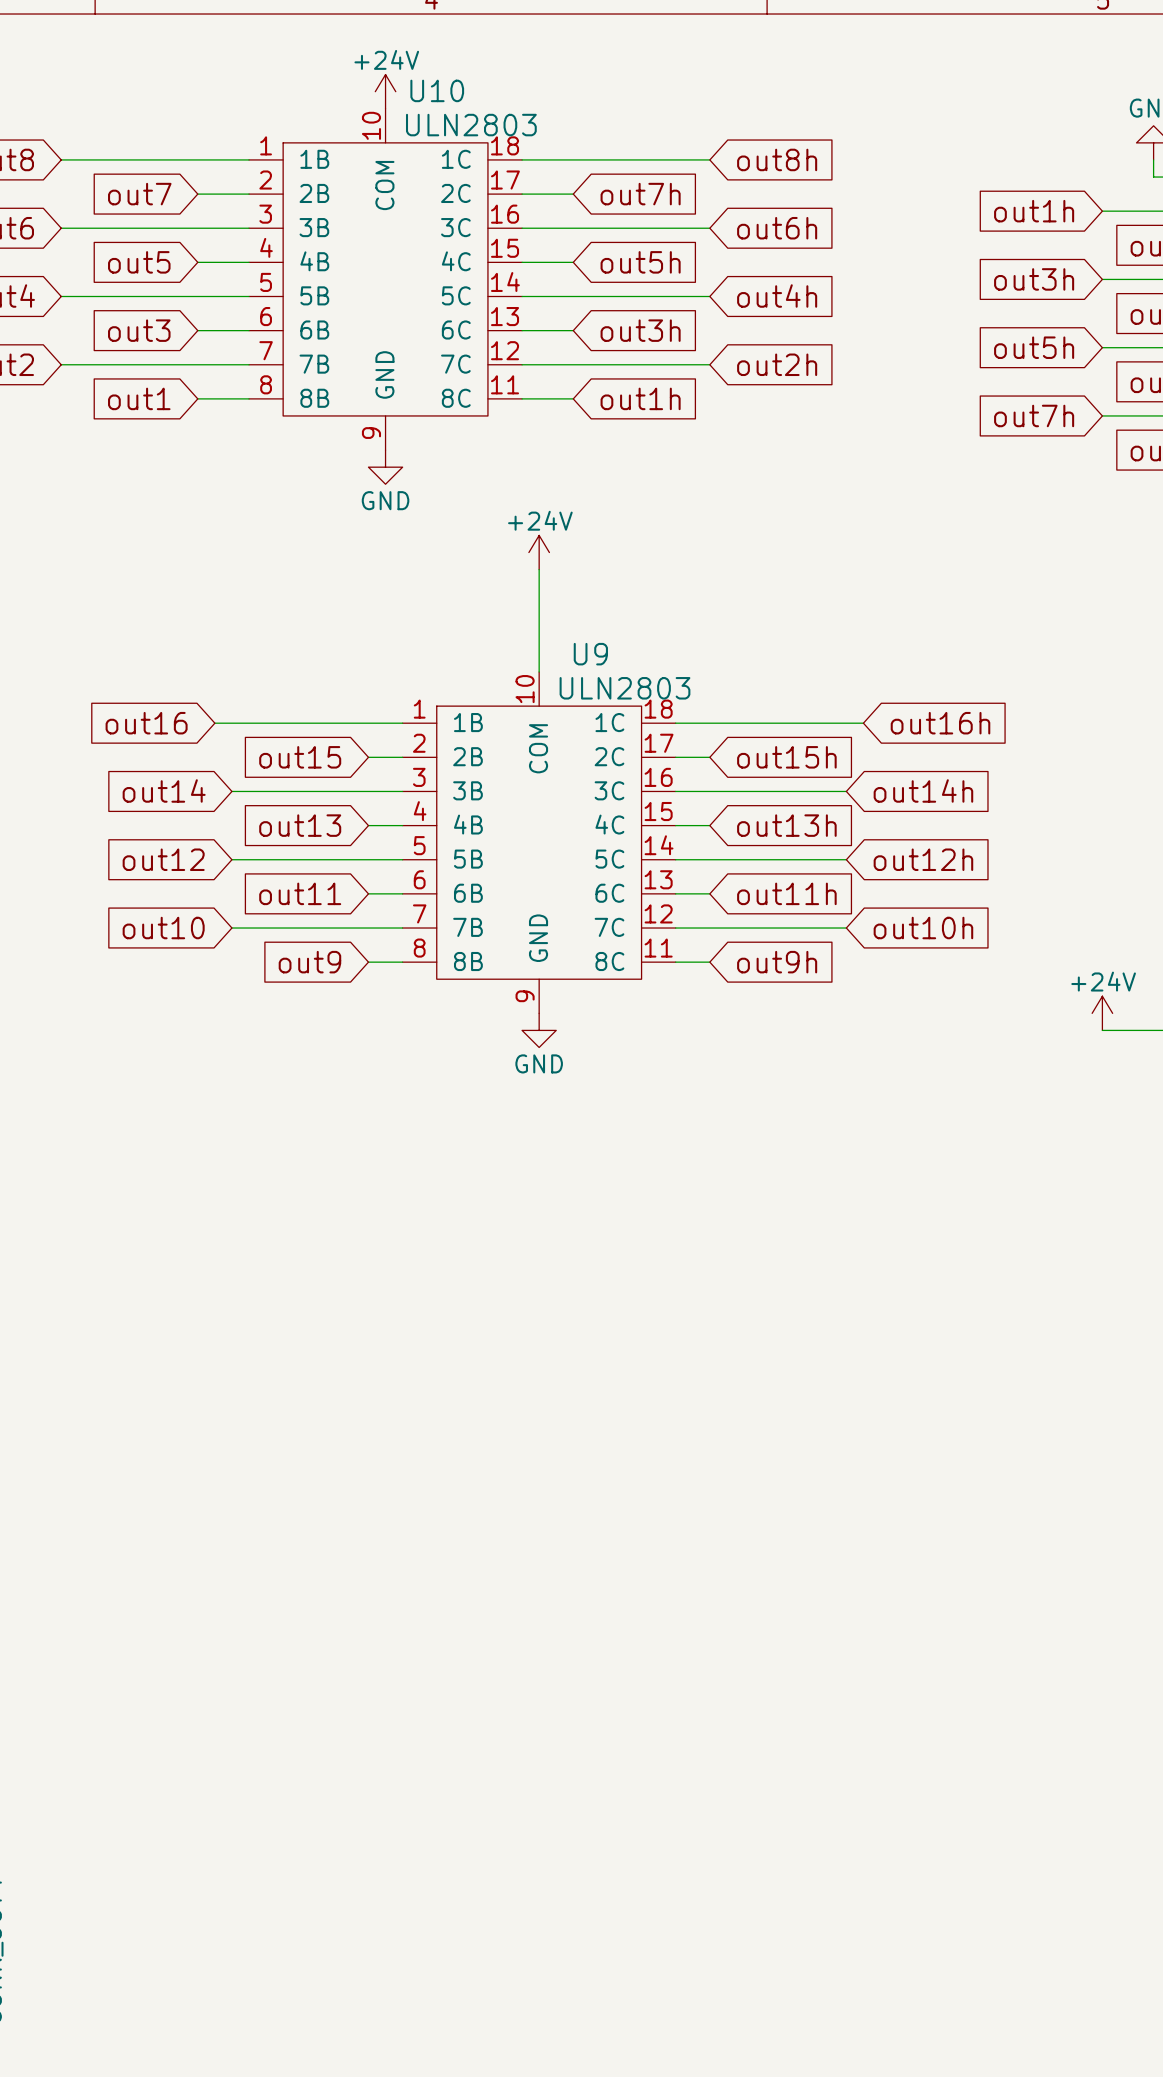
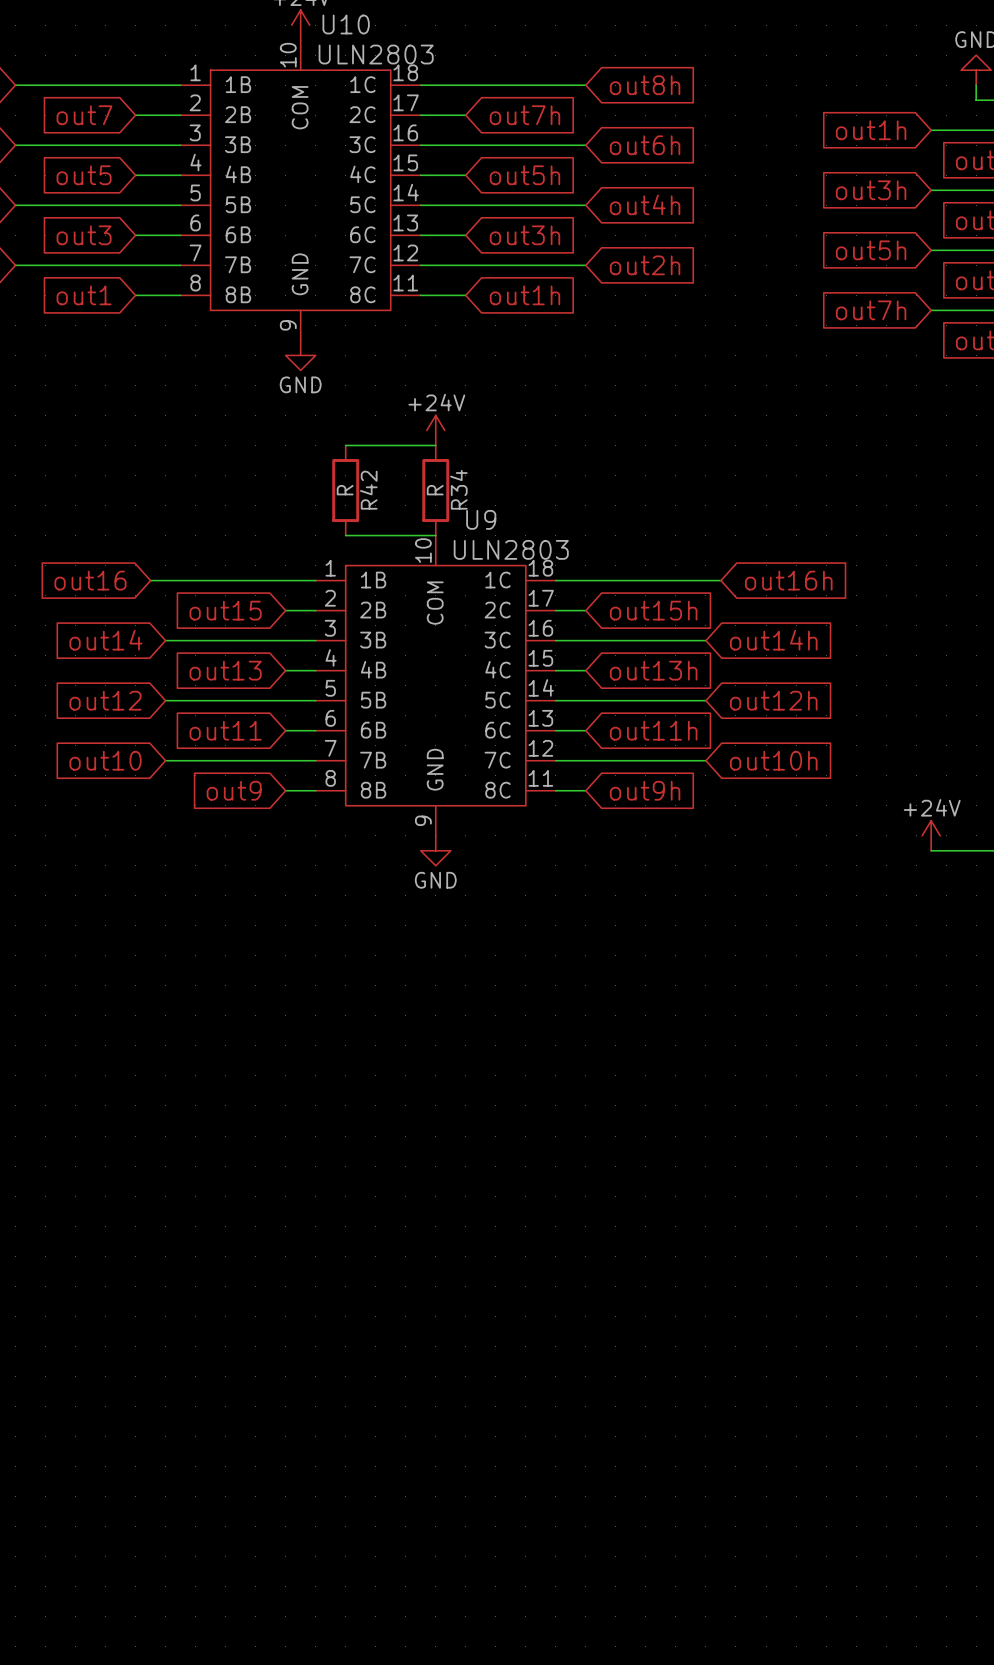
wire: (539, 569) (539, 671) -> (435, 445) (345, 445)
R42: none -> R (345, 490)
R34: none -> R (435, 490)
wire: none -> (345, 535) (435, 535)

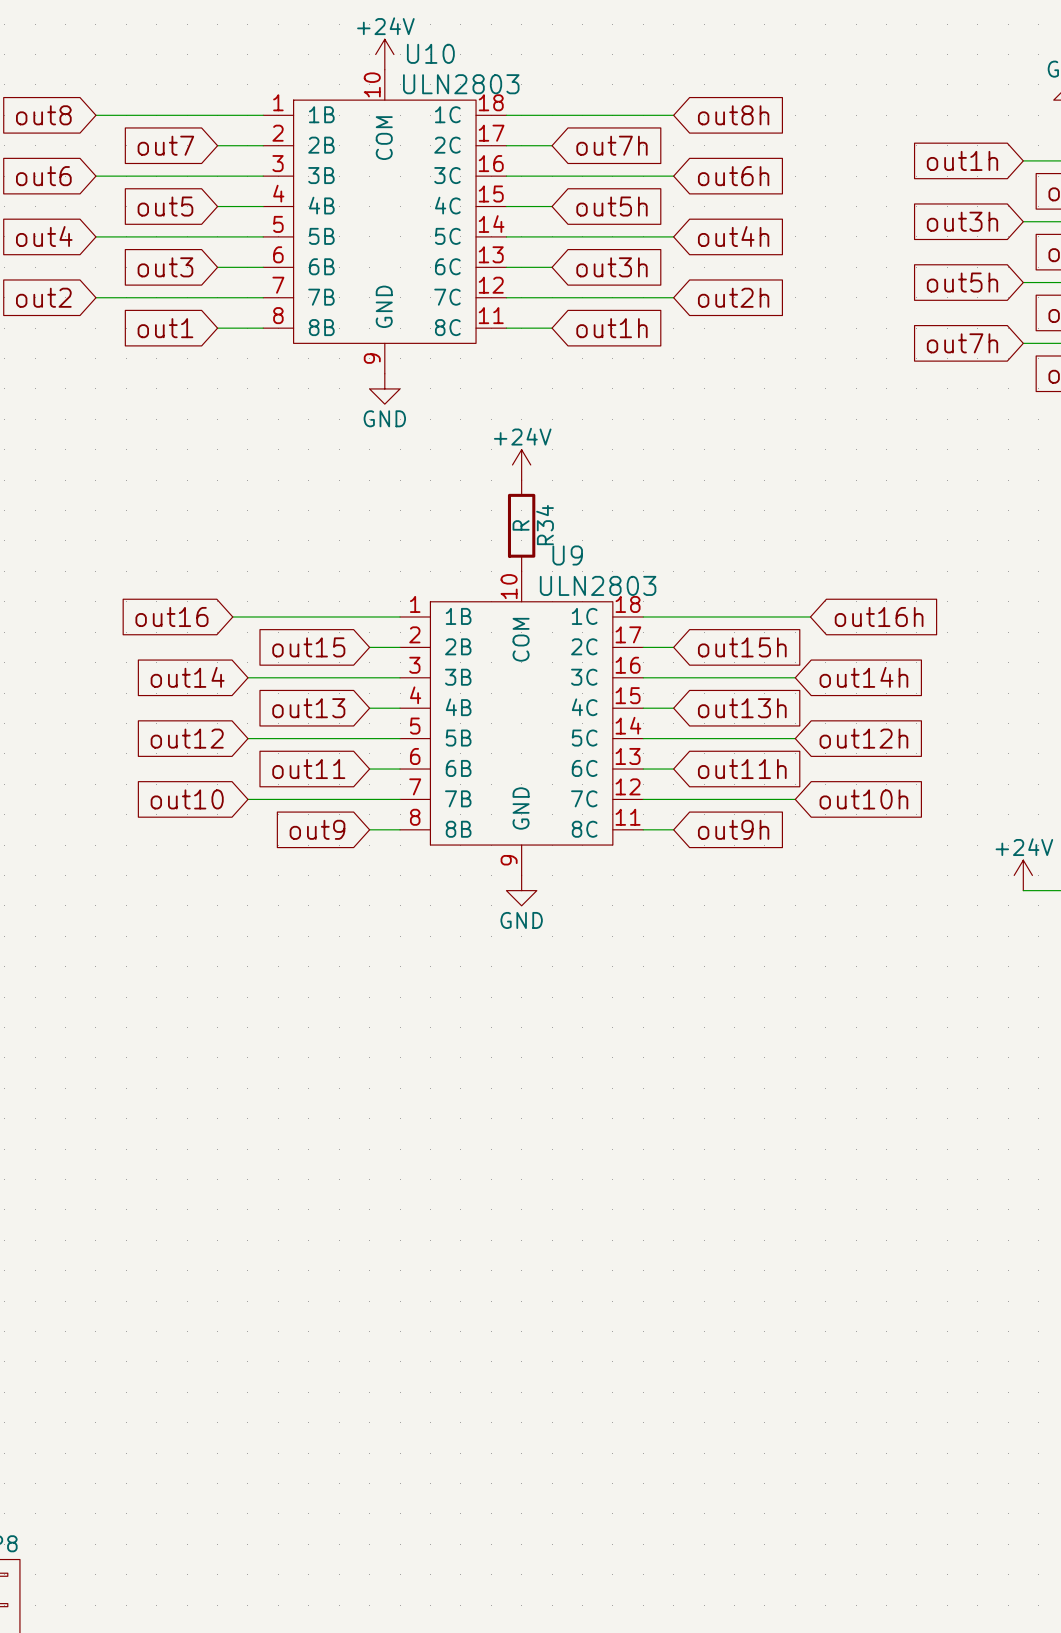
wire: (345, 445) (435, 445) -> none
R42: R (345, 490) -> none
wire: (345, 535) (435, 535) -> none

